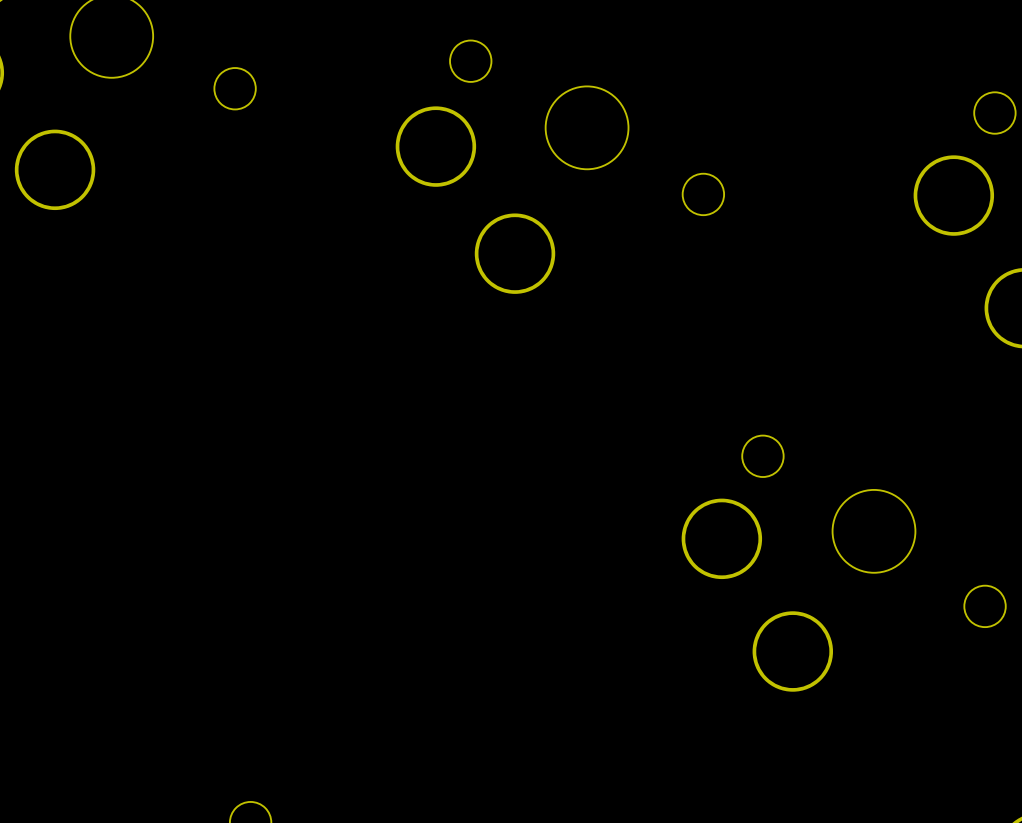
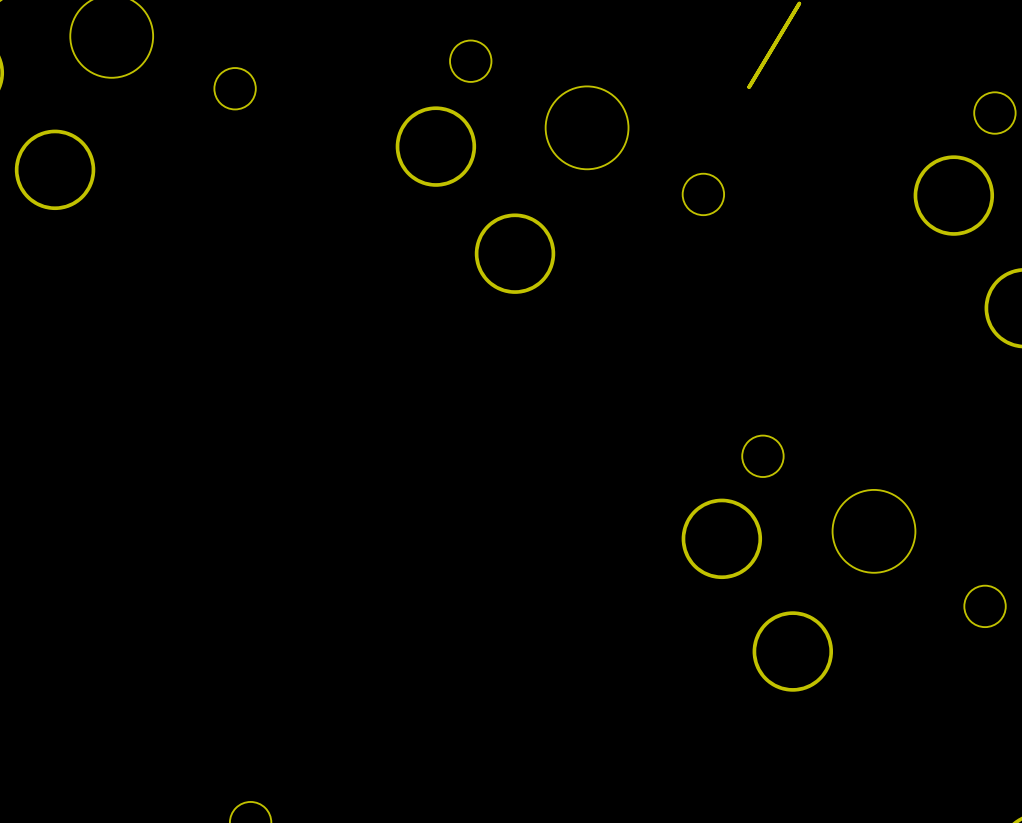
board edge: none -> (799, 3) (749, 87) (799, 3)

